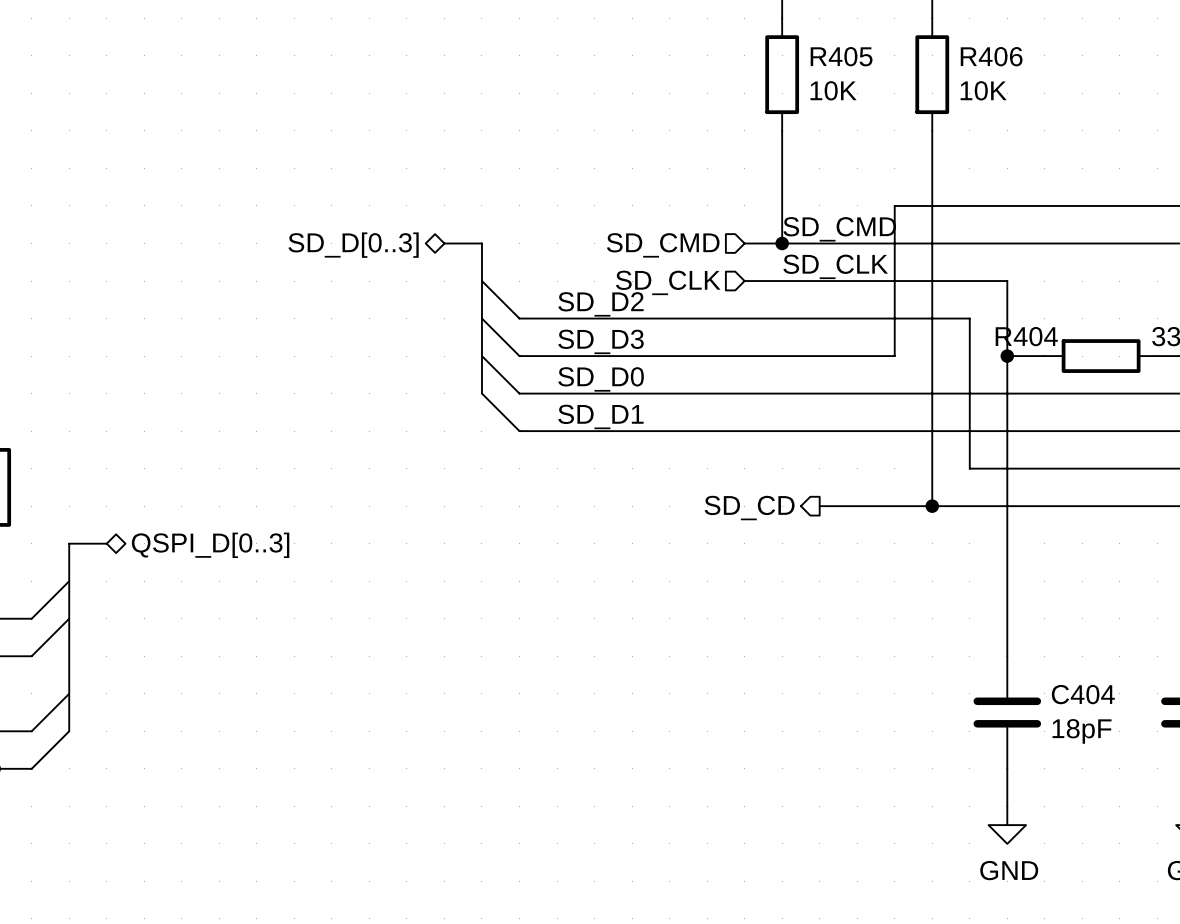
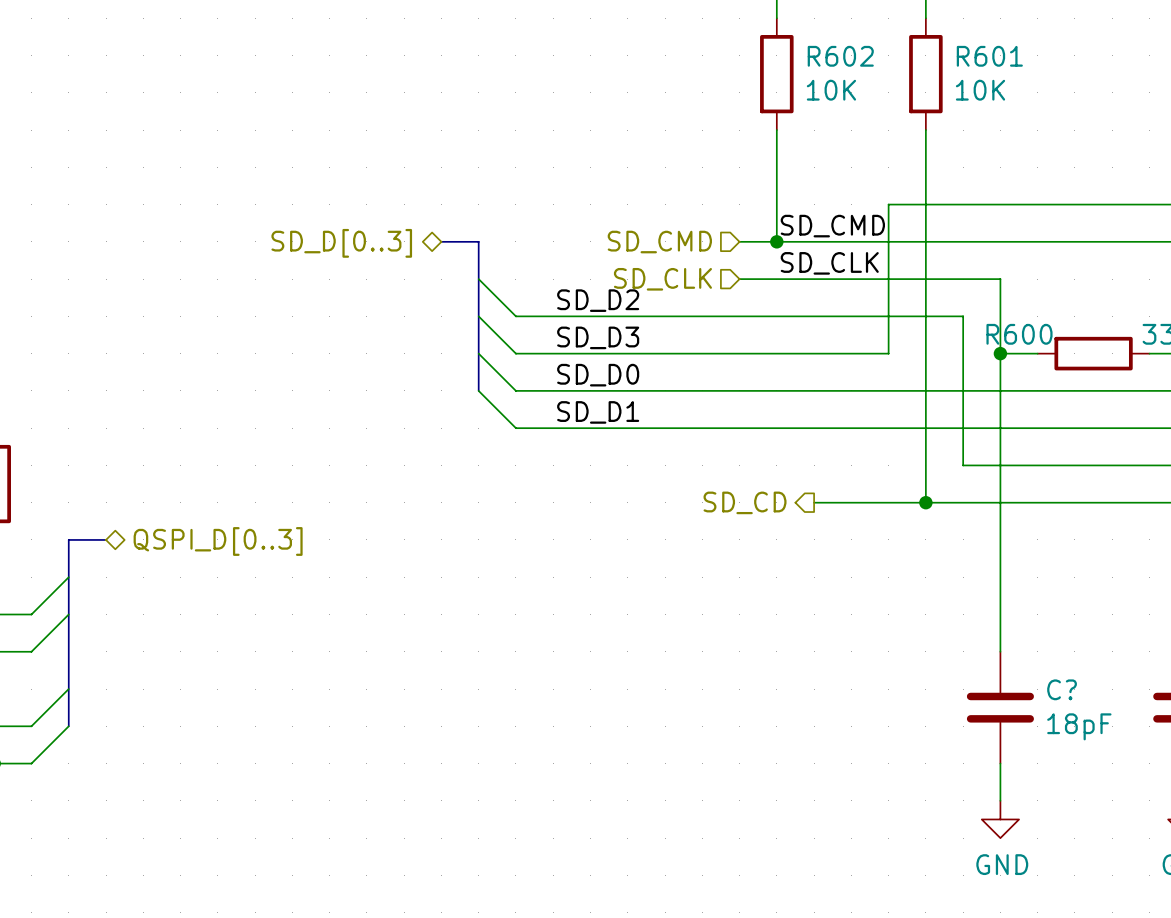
R405 name: R405 (841, 56) -> R602 (840, 56)
R406 name: R406 (991, 56) -> R601 (989, 56)
R404 name: R404 (1026, 336) -> R600 (1019, 334)
C404 name: C404 (1083, 694) -> C? (1062, 689)

